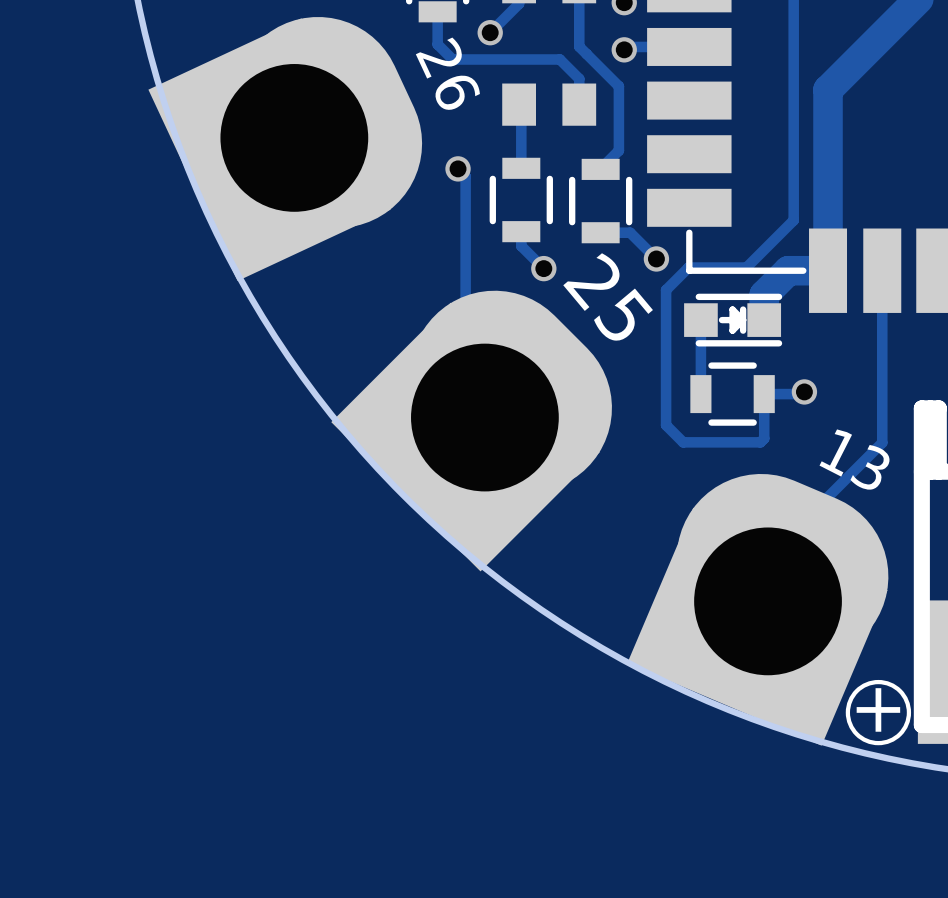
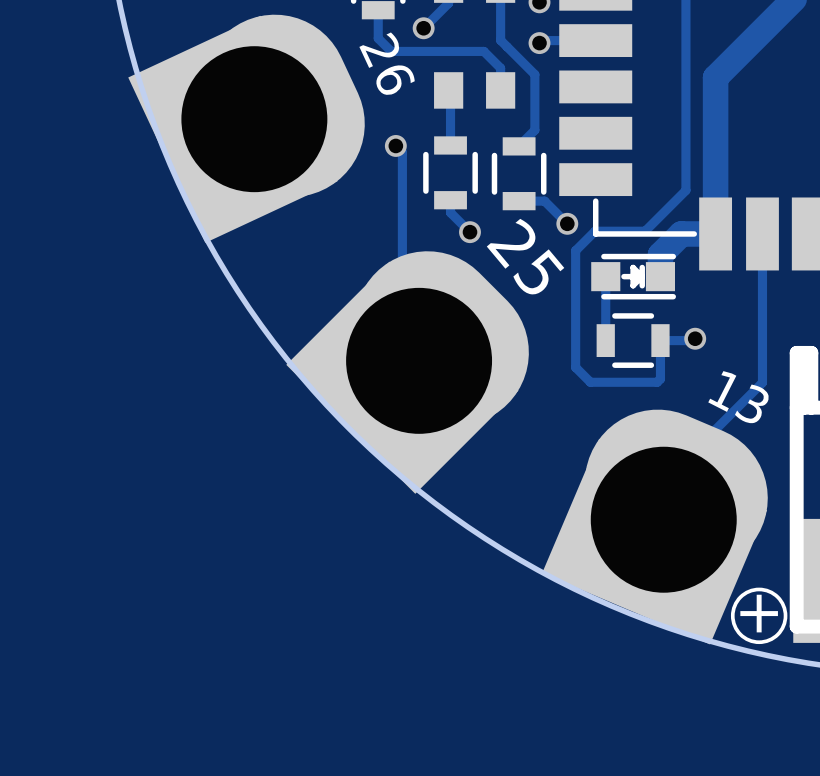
part footprint: [148, 16, 423, 282] -> [128, 14, 365, 243]
part footprint: [331, 290, 612, 572] -> [286, 251, 529, 494]
part footprint: [627, 473, 889, 746] -> [542, 409, 768, 645]

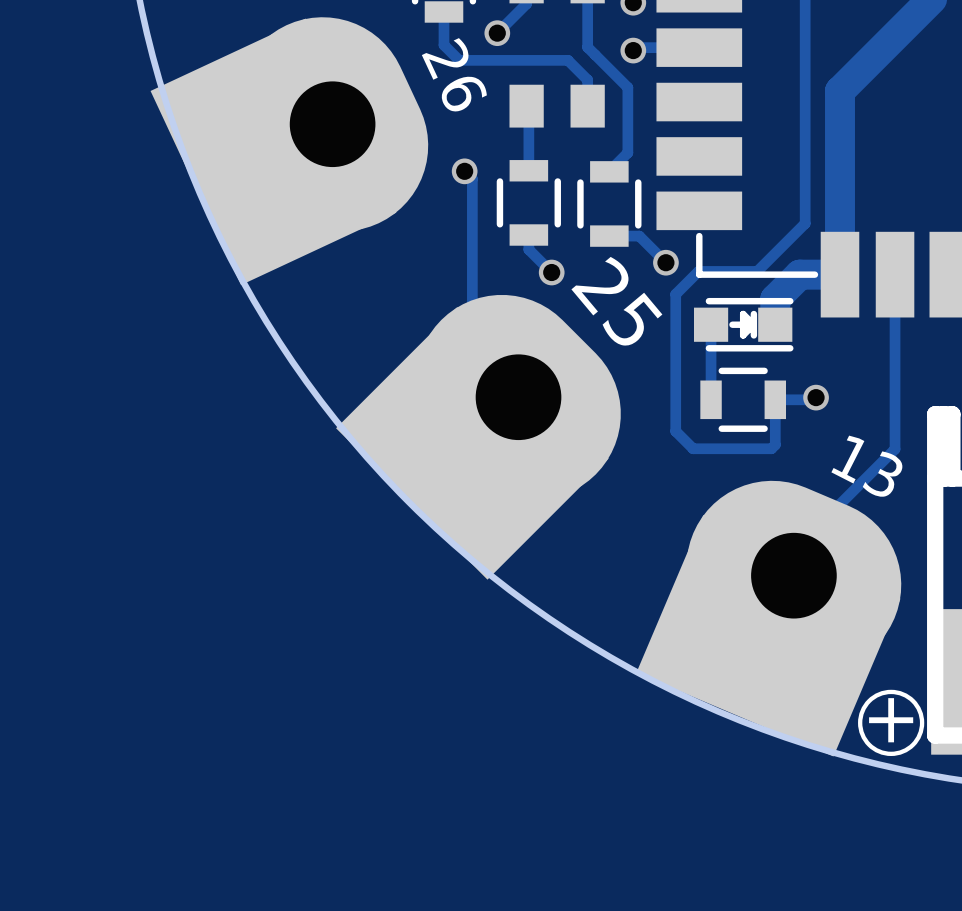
part footprint: [128, 14, 365, 243] -> [150, 17, 429, 286]
part footprint: [286, 251, 529, 494] -> [336, 294, 621, 580]
part footprint: [542, 409, 768, 645] -> [636, 480, 902, 757]

